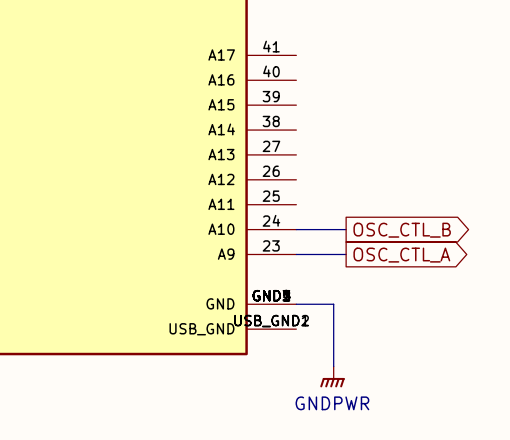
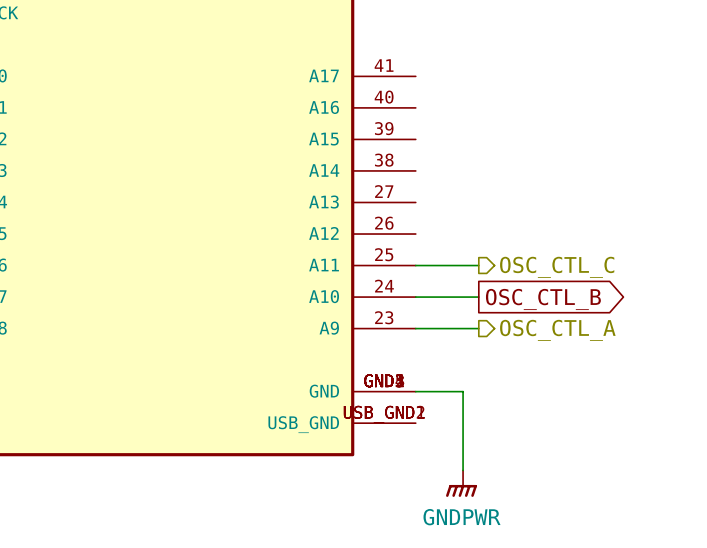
wire: none -> (415, 265) (478, 265)
hierarchical label: none -> OSC_CTL_C (557, 267)
hierarchical label: none -> OSC_CTL_A (557, 330)
global label: OSC_CTL_A (401, 255) -> none

